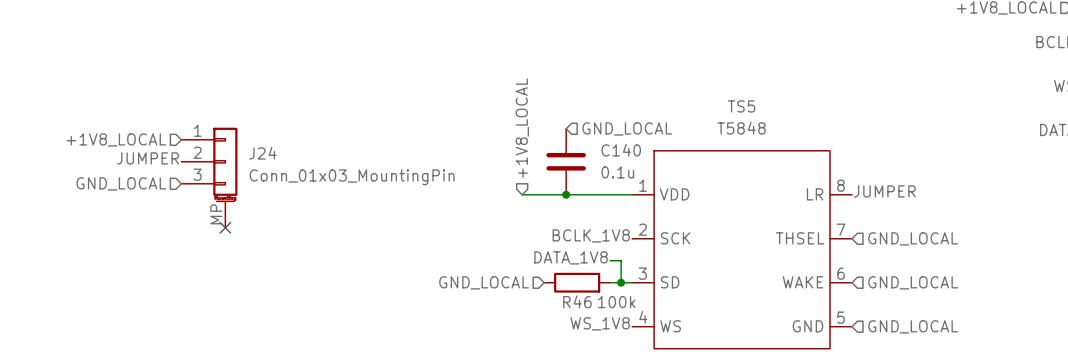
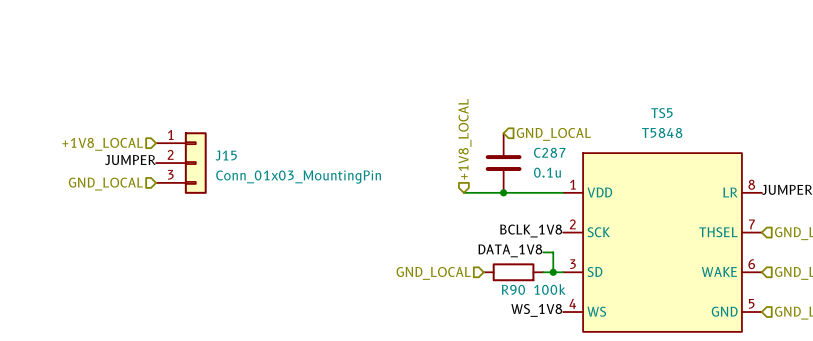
C140 name: C140 (621, 150) -> C287 (549, 152)
J15: none -> Conn_01x03_MountingPin (181, 163)
J24: Conn_01x03_MountingPin (209, 177) -> none
no-connect mark: (225, 227) -> none
R46 name: R46 (577, 301) -> R90 (513, 289)

